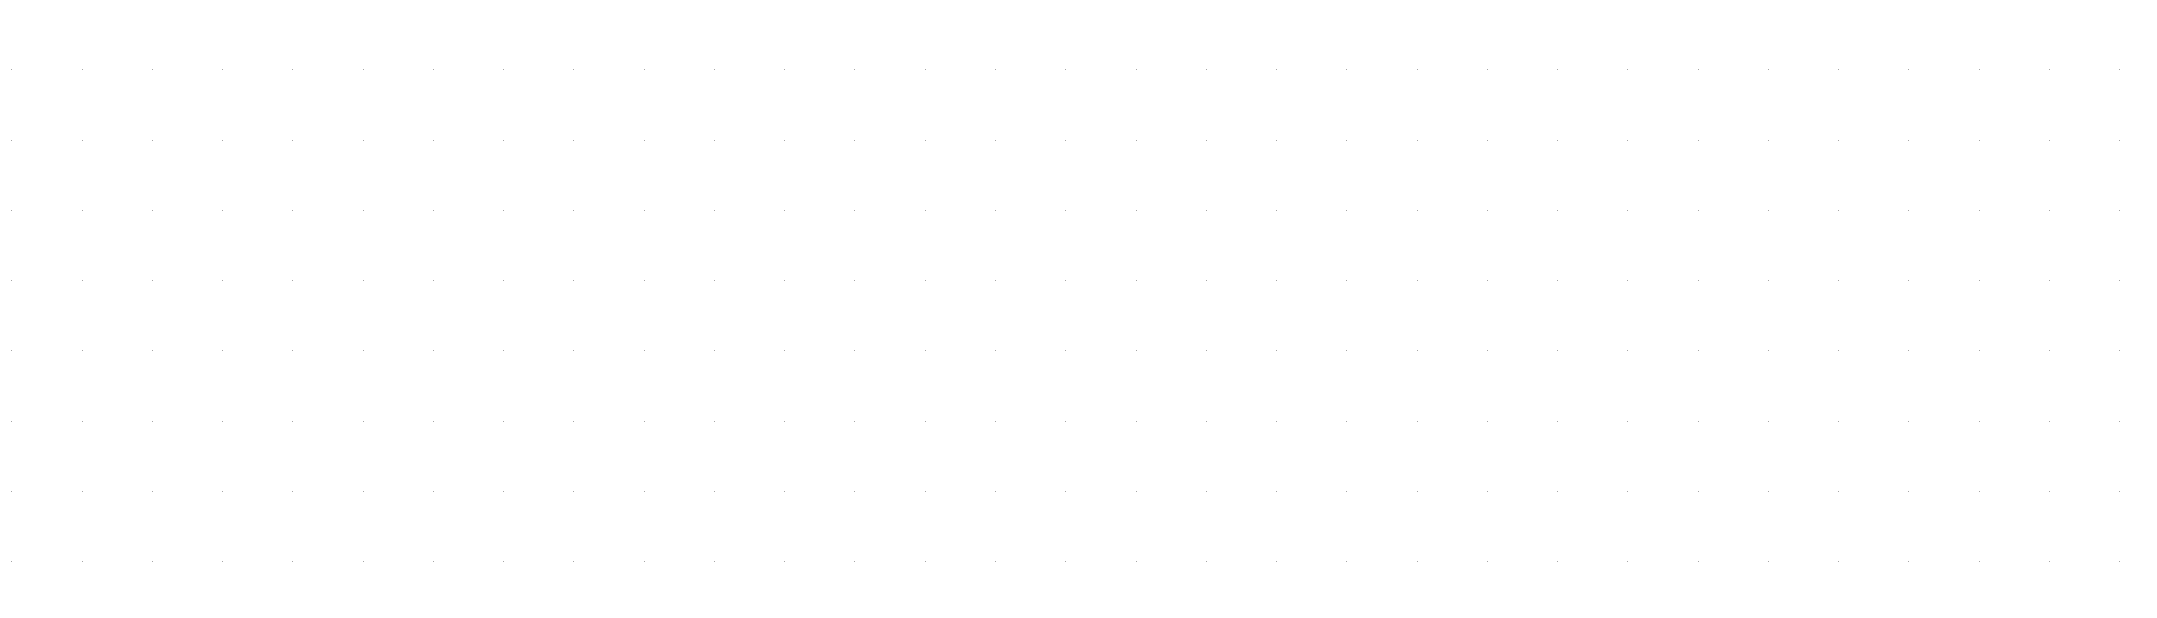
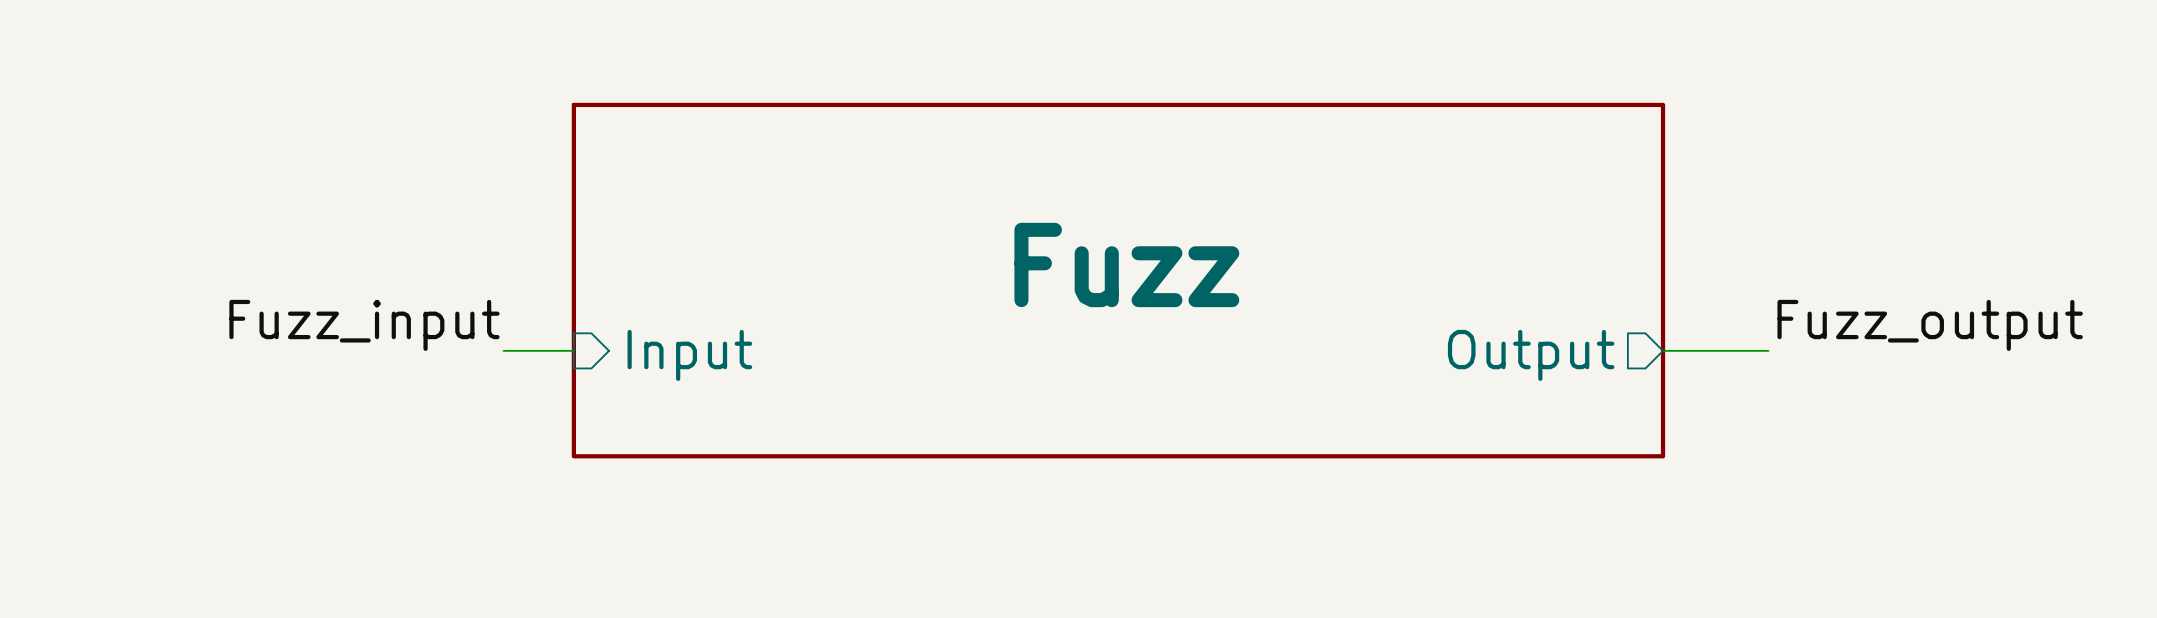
sheet Fuzz: none -> (1118, 280)
label: none -> Fuzz_input (364, 325)
label: none -> Fuzz_output (1930, 325)
wire: none -> (503, 350) (573, 350)
wire: none -> (1663, 350) (1768, 350)
sheet pin: none -> Input (689, 355)
sheet pin: none -> Output (1531, 355)

